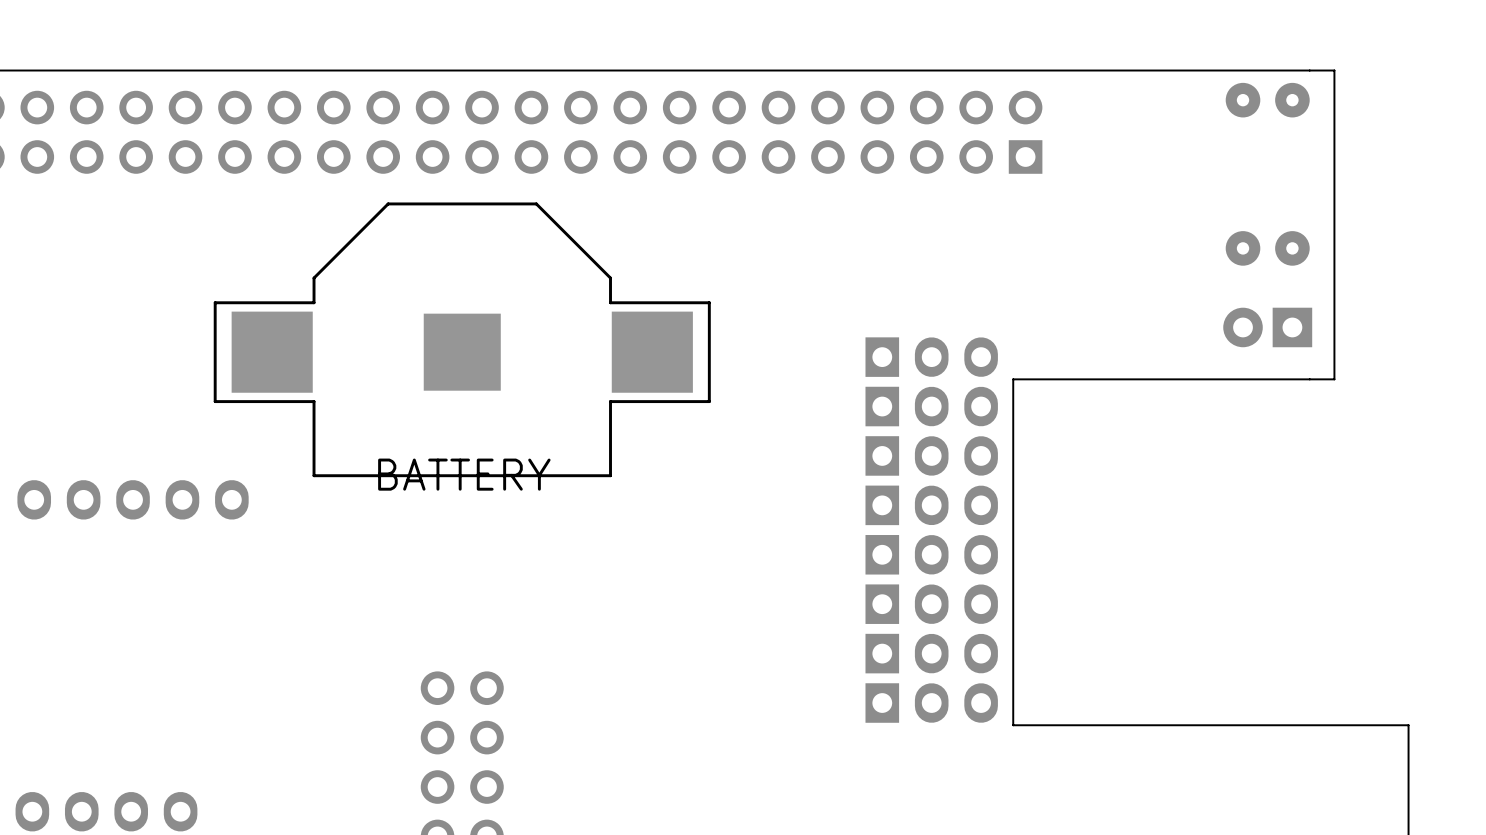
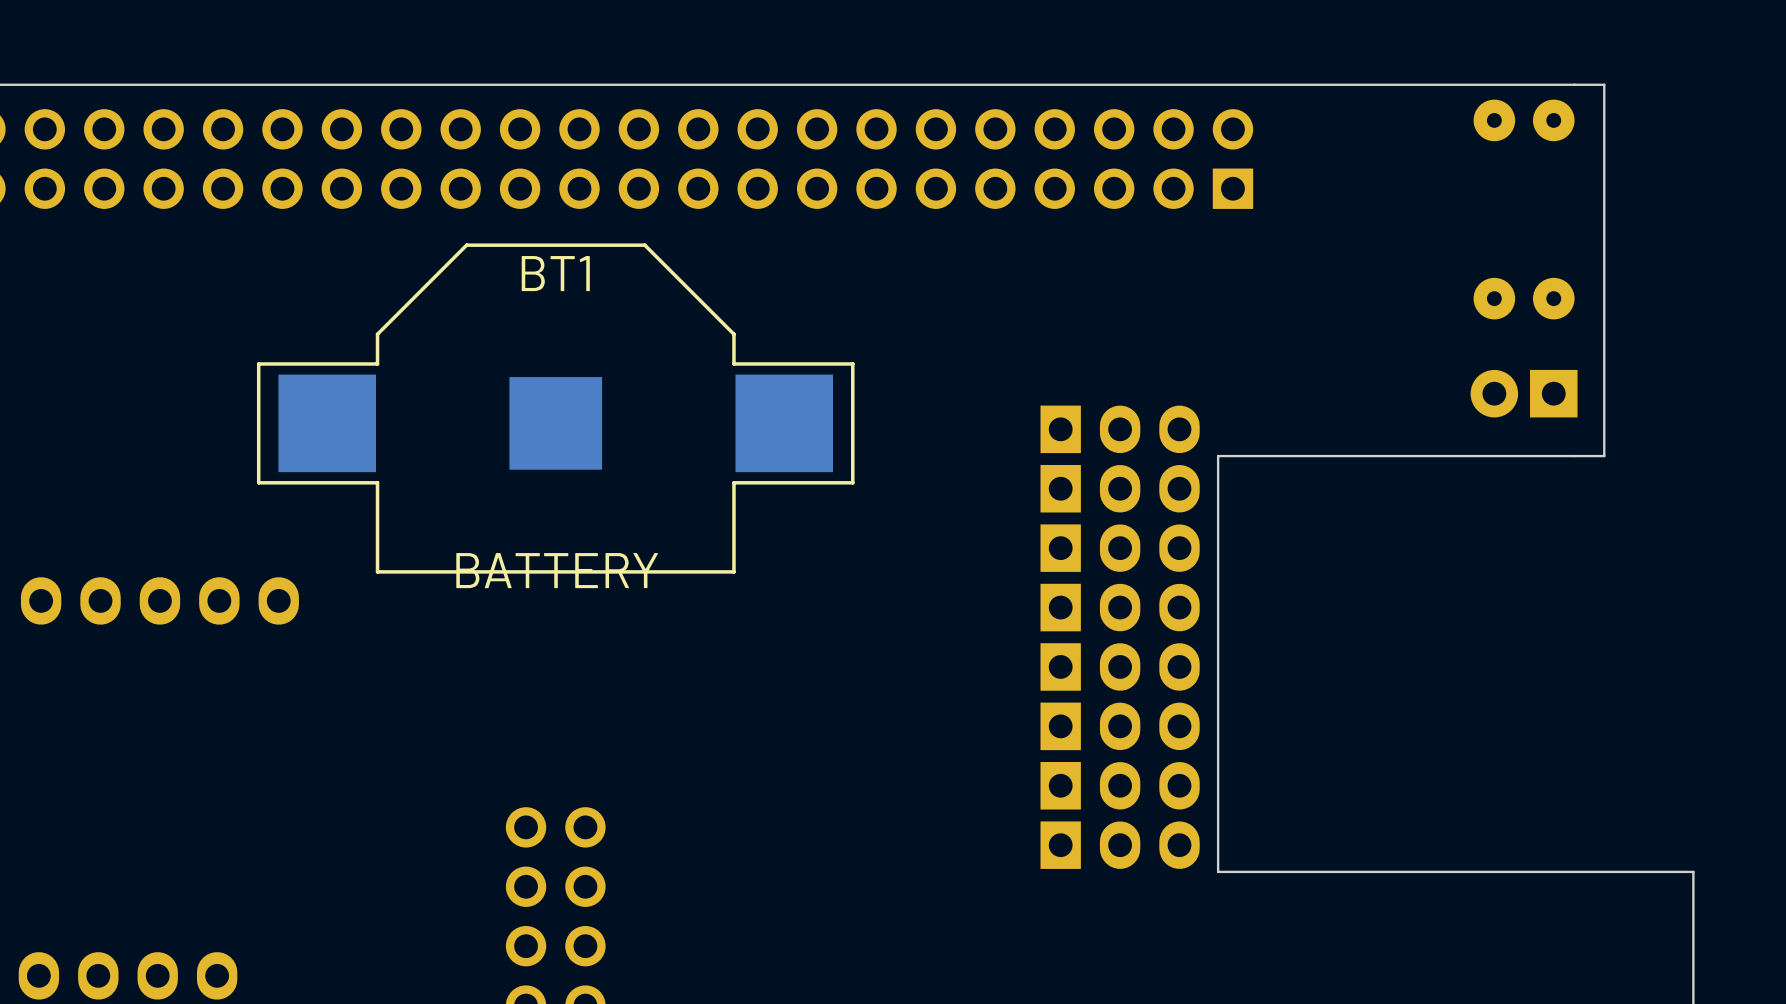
BT1 name: none -> BT1 (555, 273)

